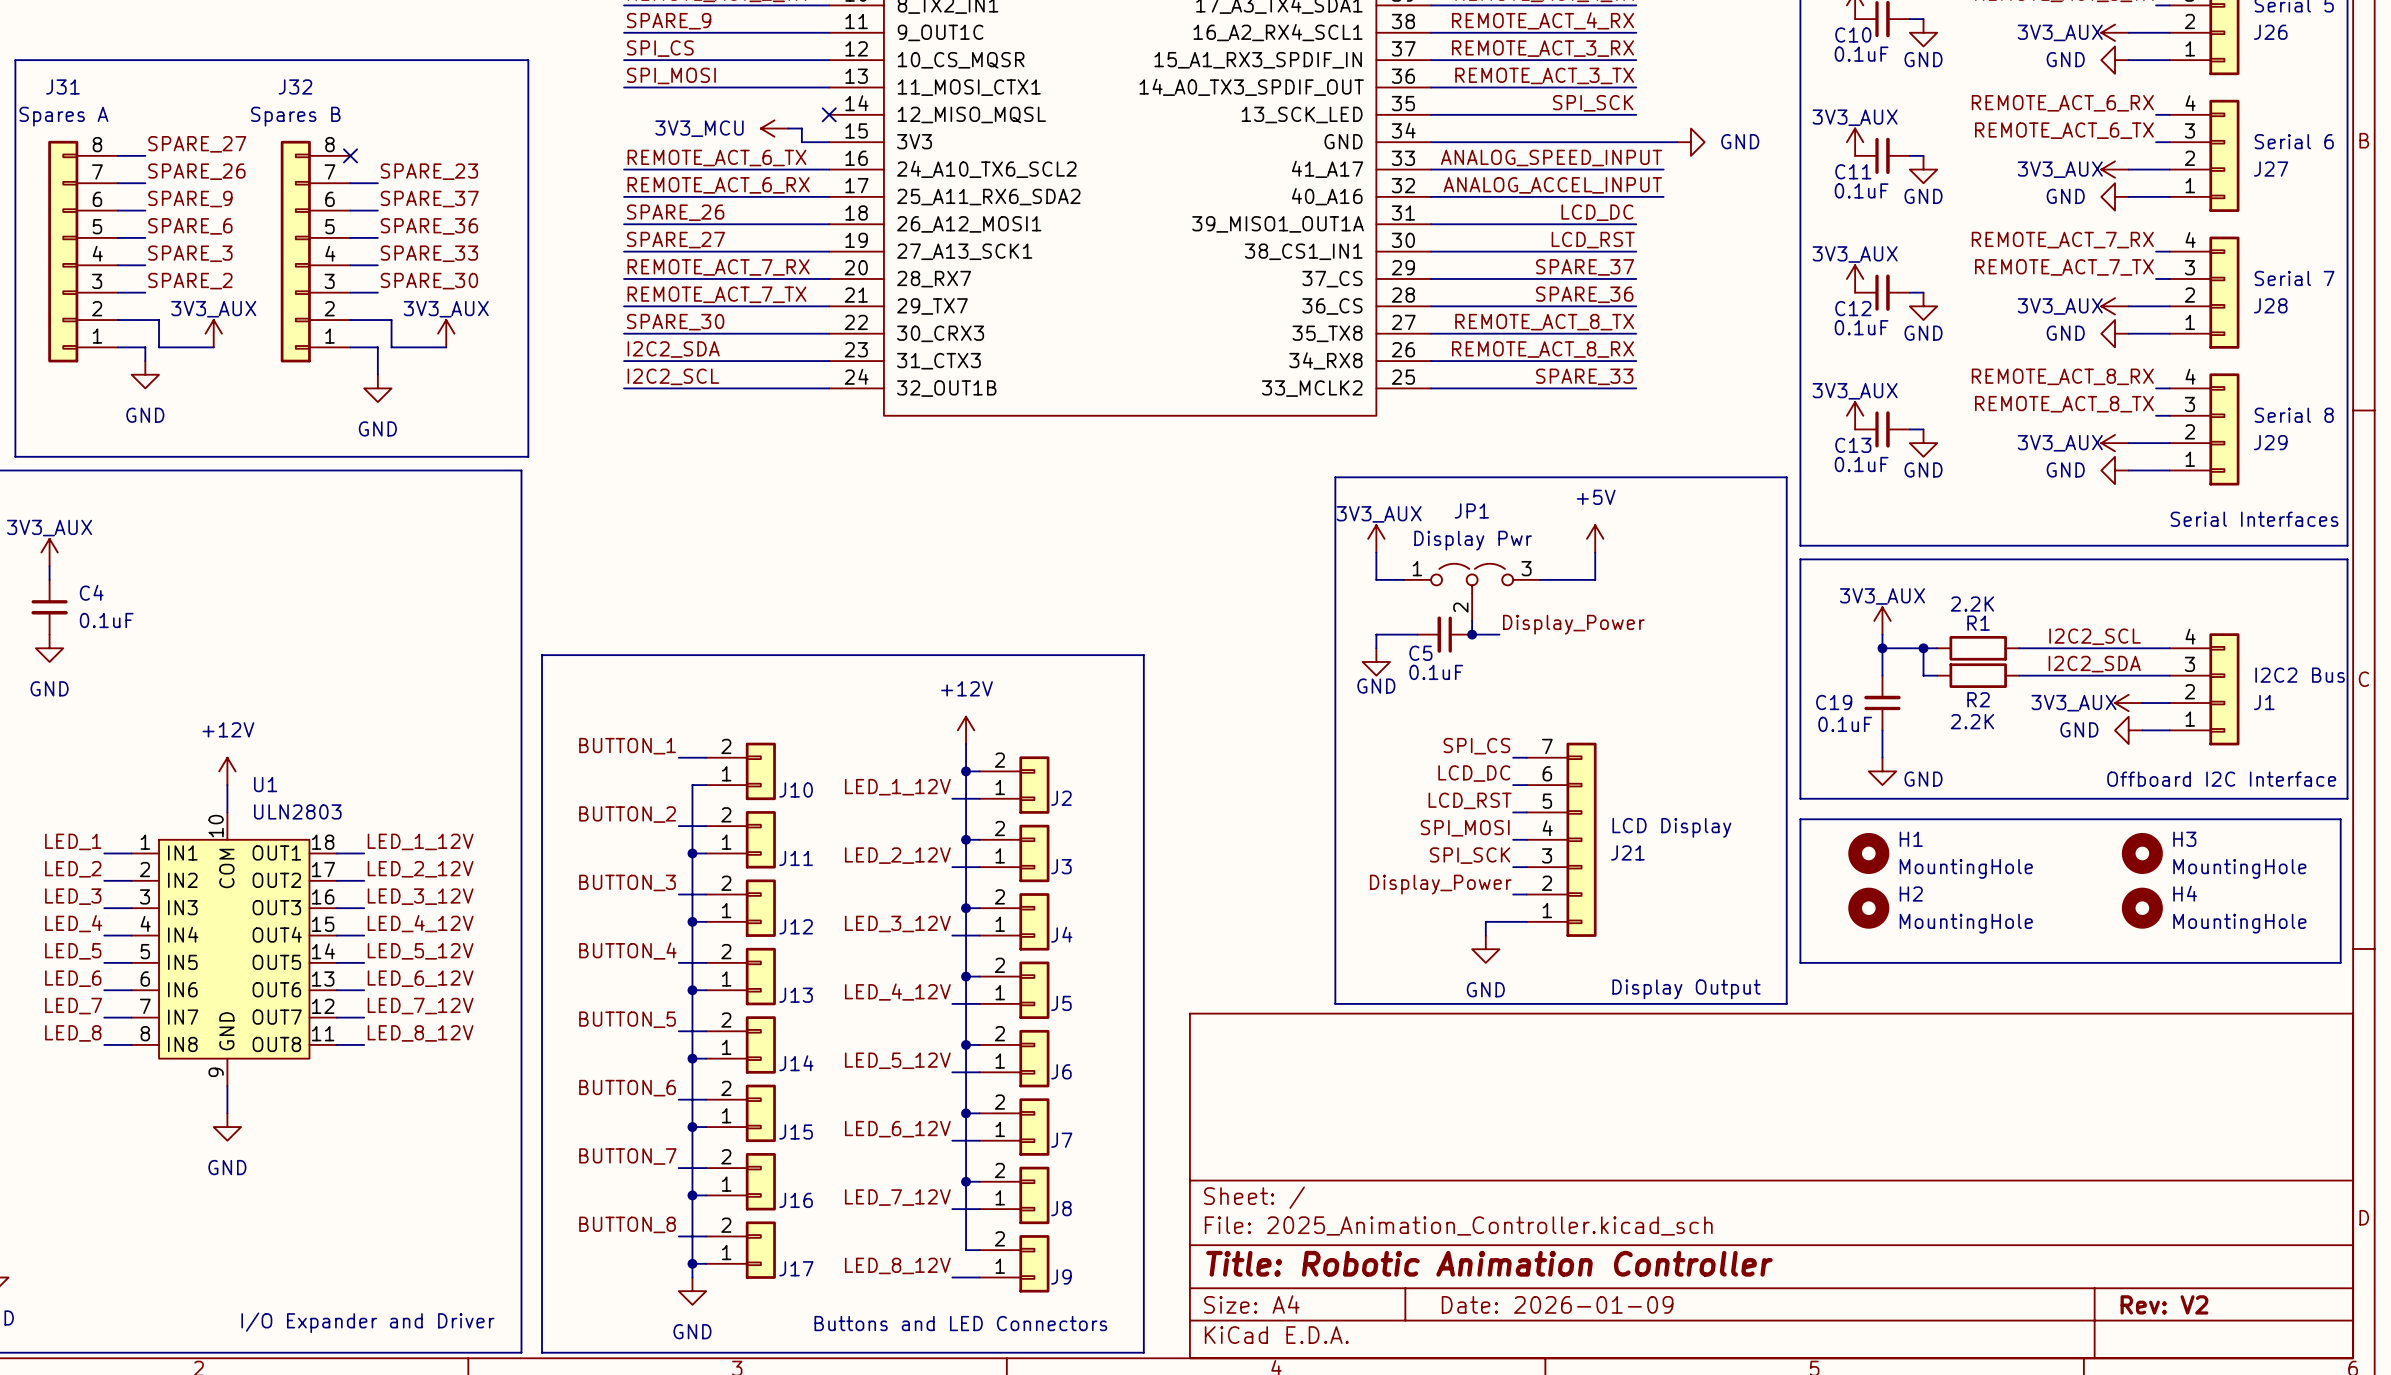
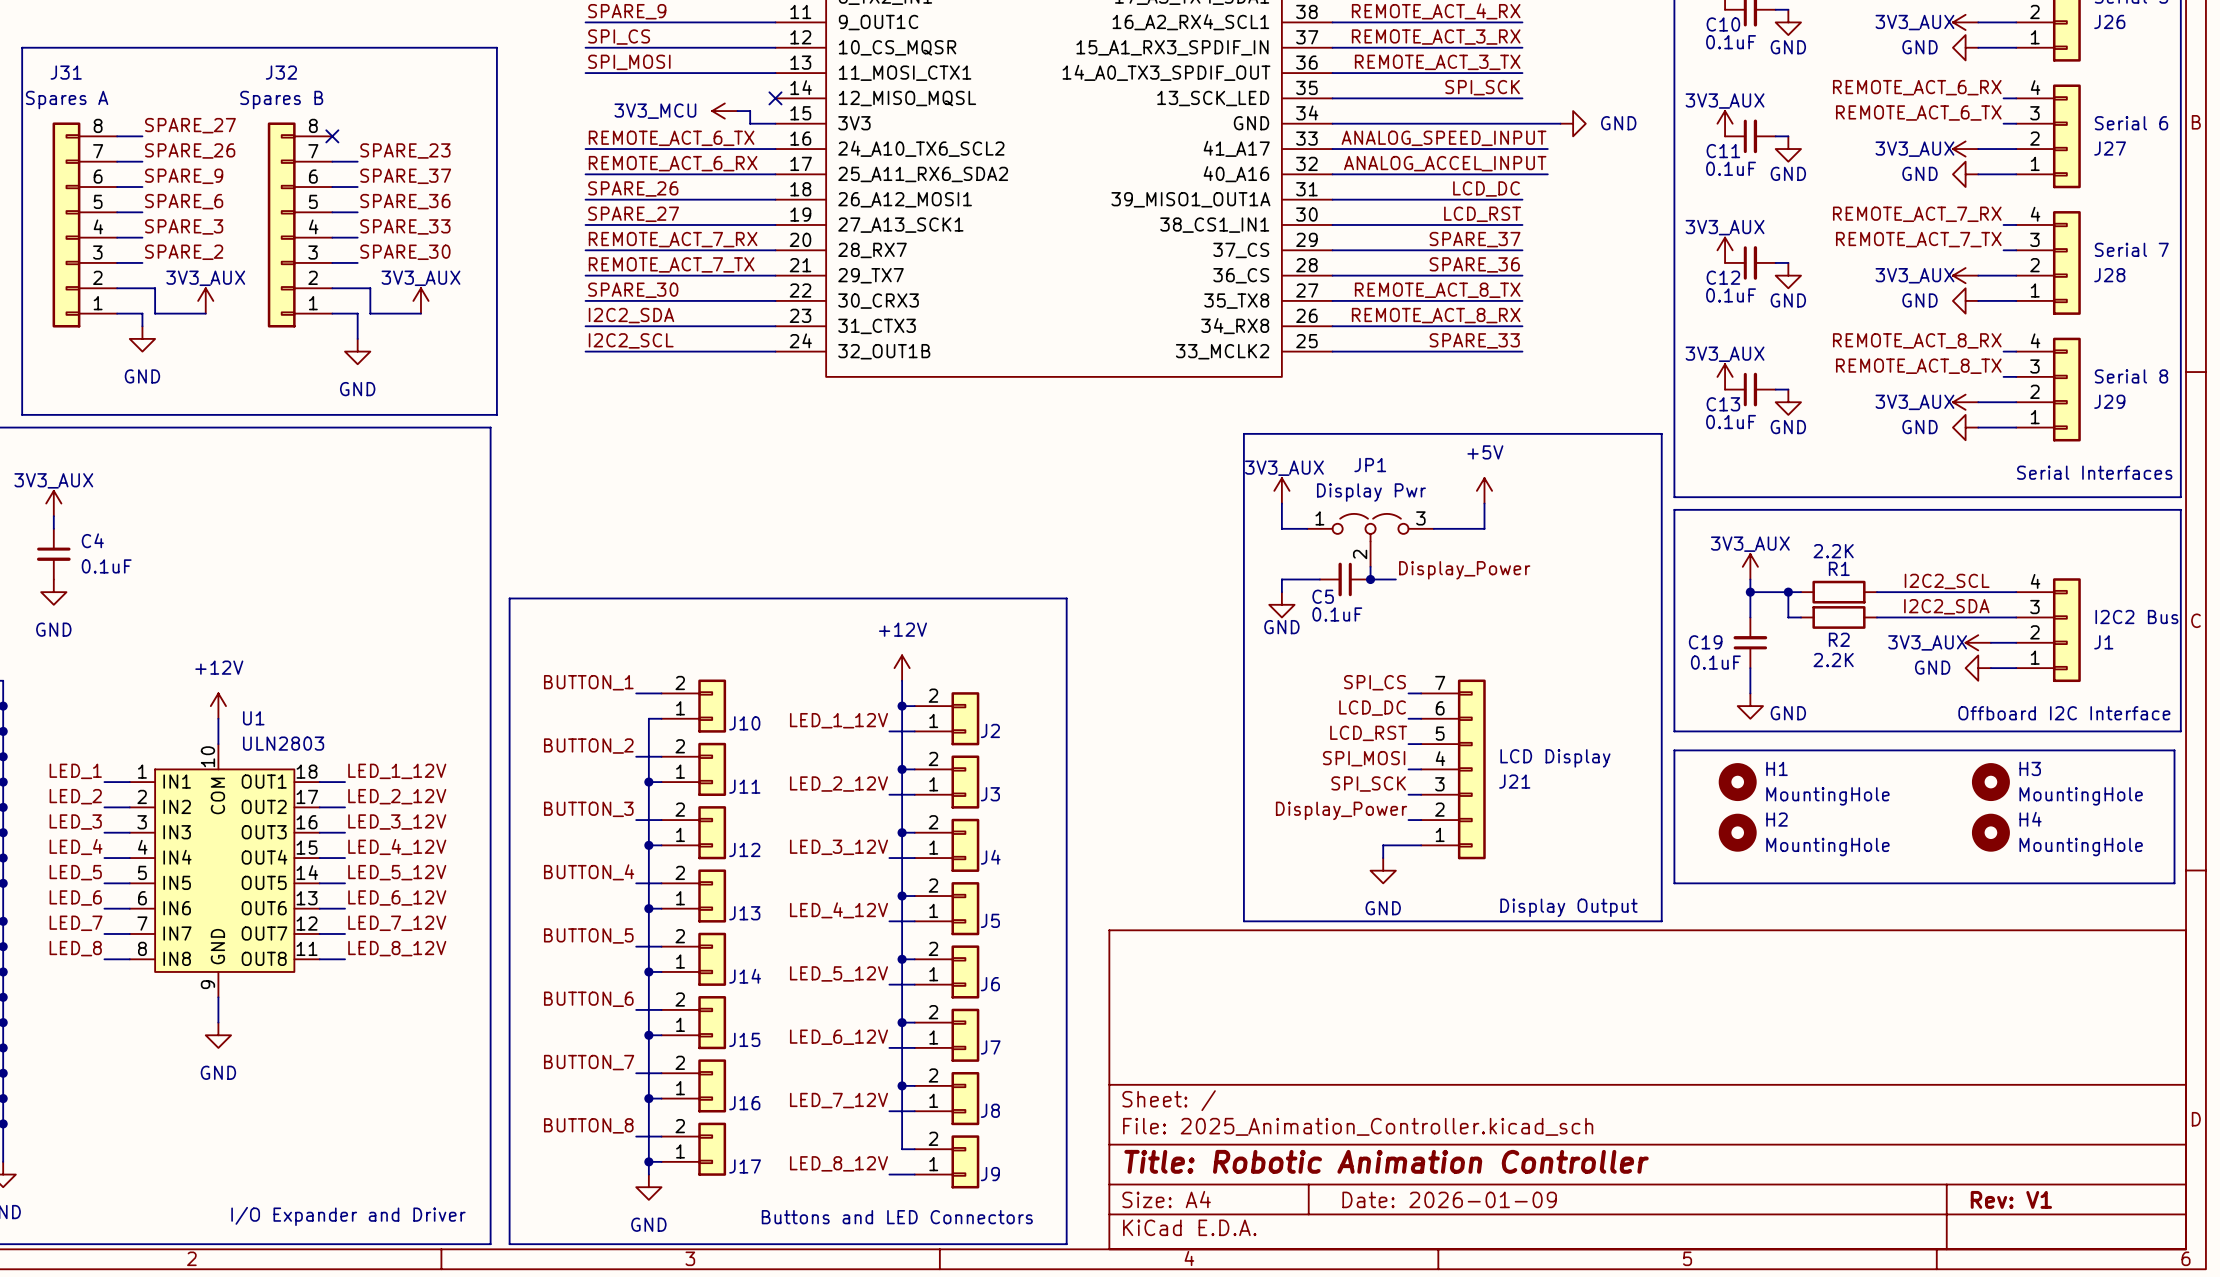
title block: Rev: V2 (2164, 1304) -> Rev: V1 (2011, 1199)

